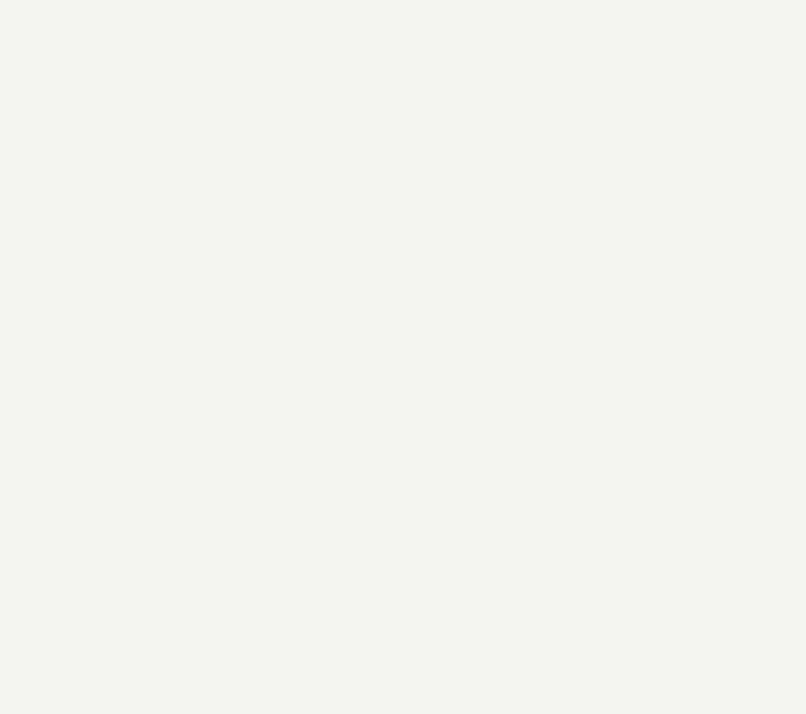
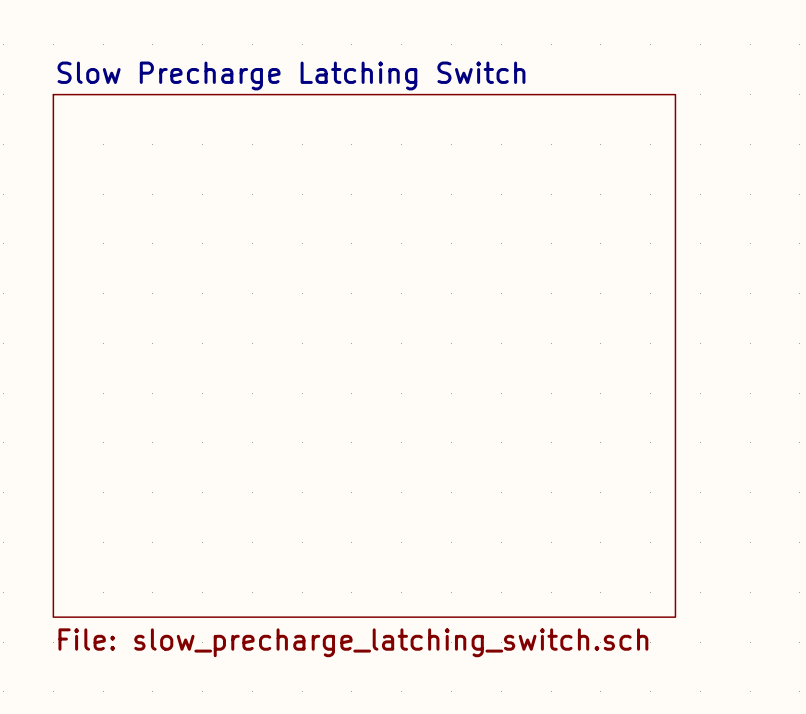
sheet Slow Precharge Latching Switch: none -> File: slow_precharge_latching_switch.sch (364, 355)

